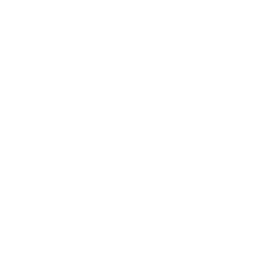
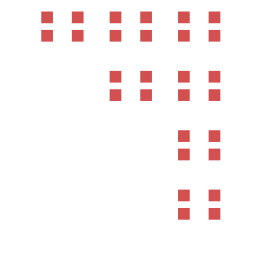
part: none -> (62, 26)
part: none -> (130, 26)
part: none -> (199, 26)
part: none -> (130, 85)
part: none -> (199, 85)
part: none -> (199, 145)
part: none -> (199, 204)

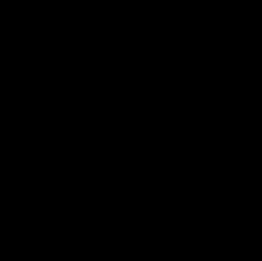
part: (62, 26) -> none
part: (130, 26) -> none
part: (199, 26) -> none
part: (130, 85) -> none
part: (199, 85) -> none
part: (199, 145) -> none
part: (199, 204) -> none

